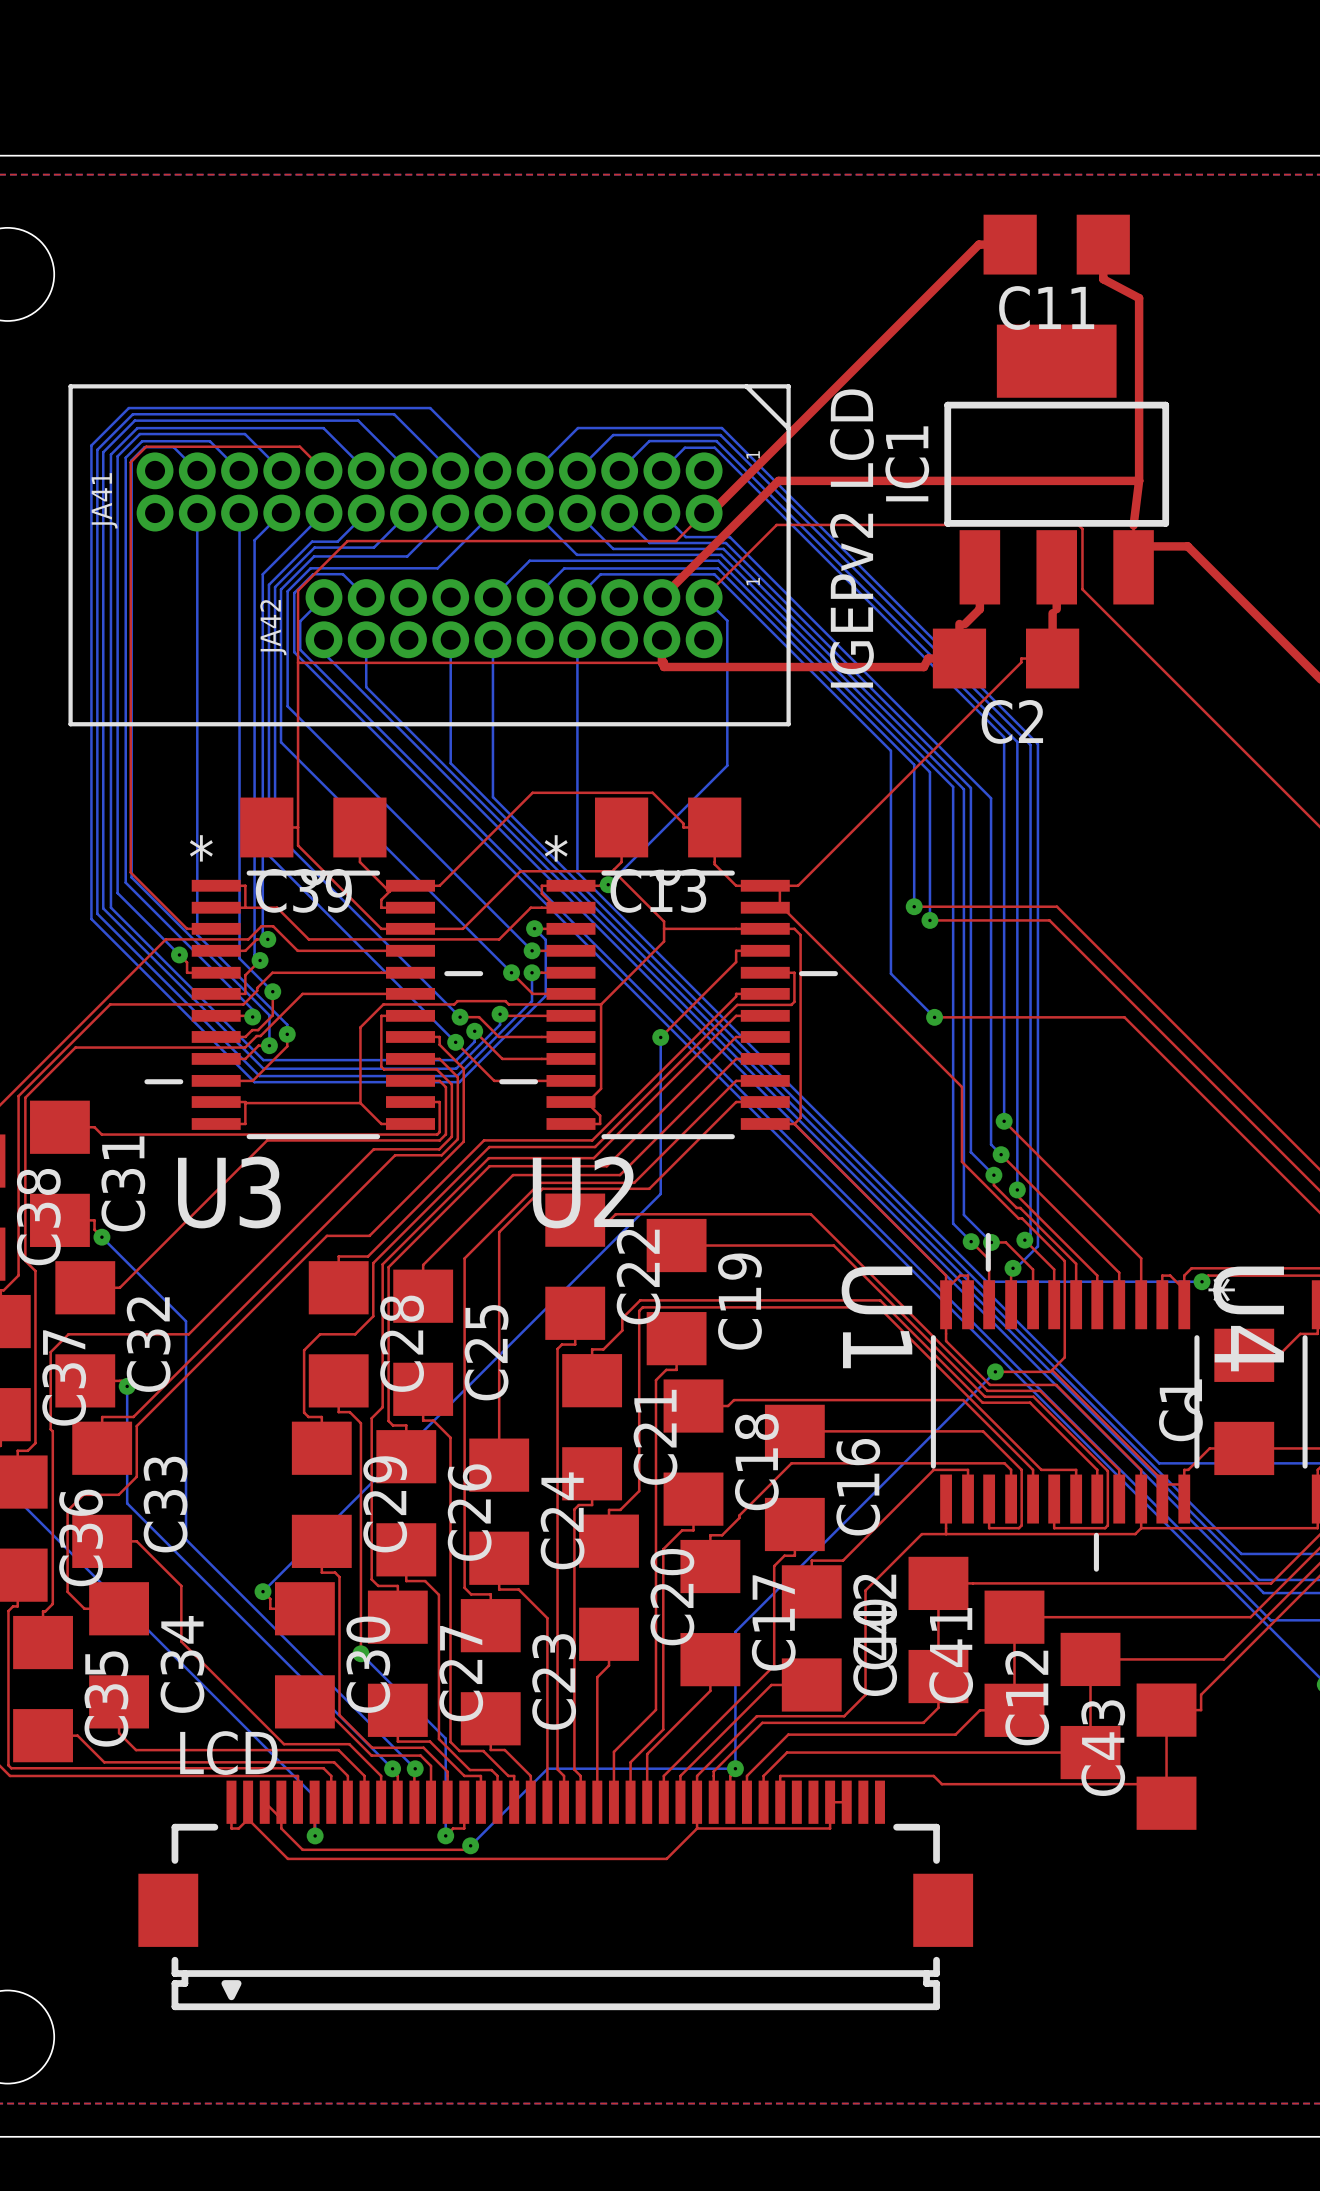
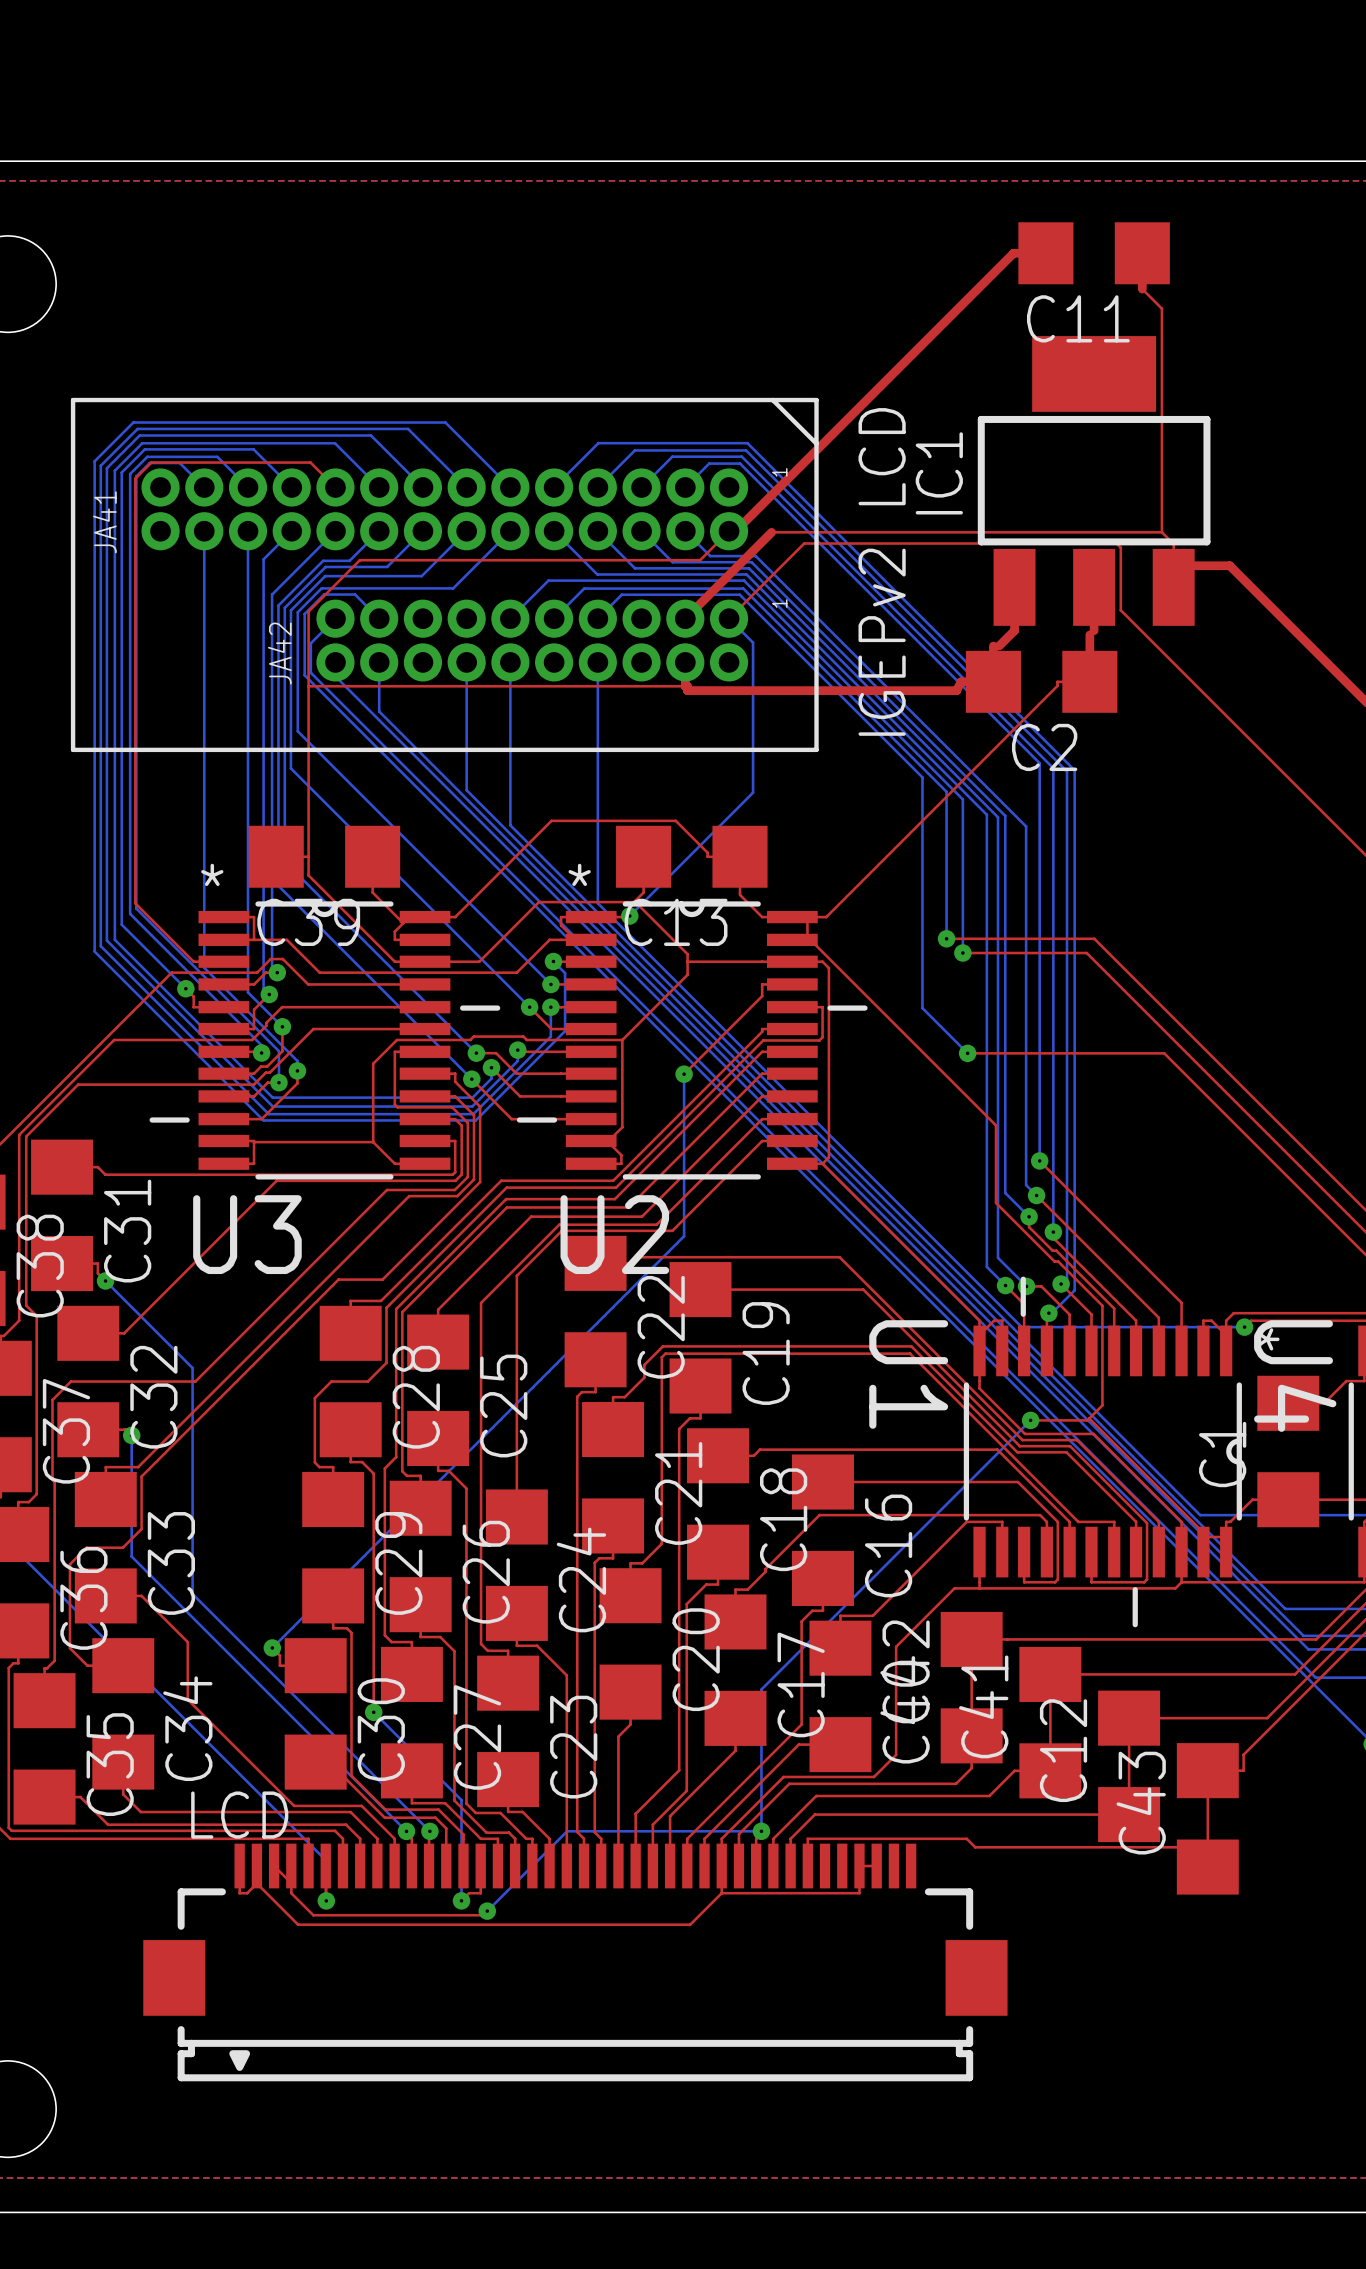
top track: (1103, 279) (1139, 298) (1139, 480) -> (1142, 289) (1161, 308) (1161, 532)
top track: (1139, 480) (1133, 525) -> (1161, 532) (1173, 544)
top track: (1139, 480) (778, 480) (745, 514) -> (1161, 532) (771, 532)

